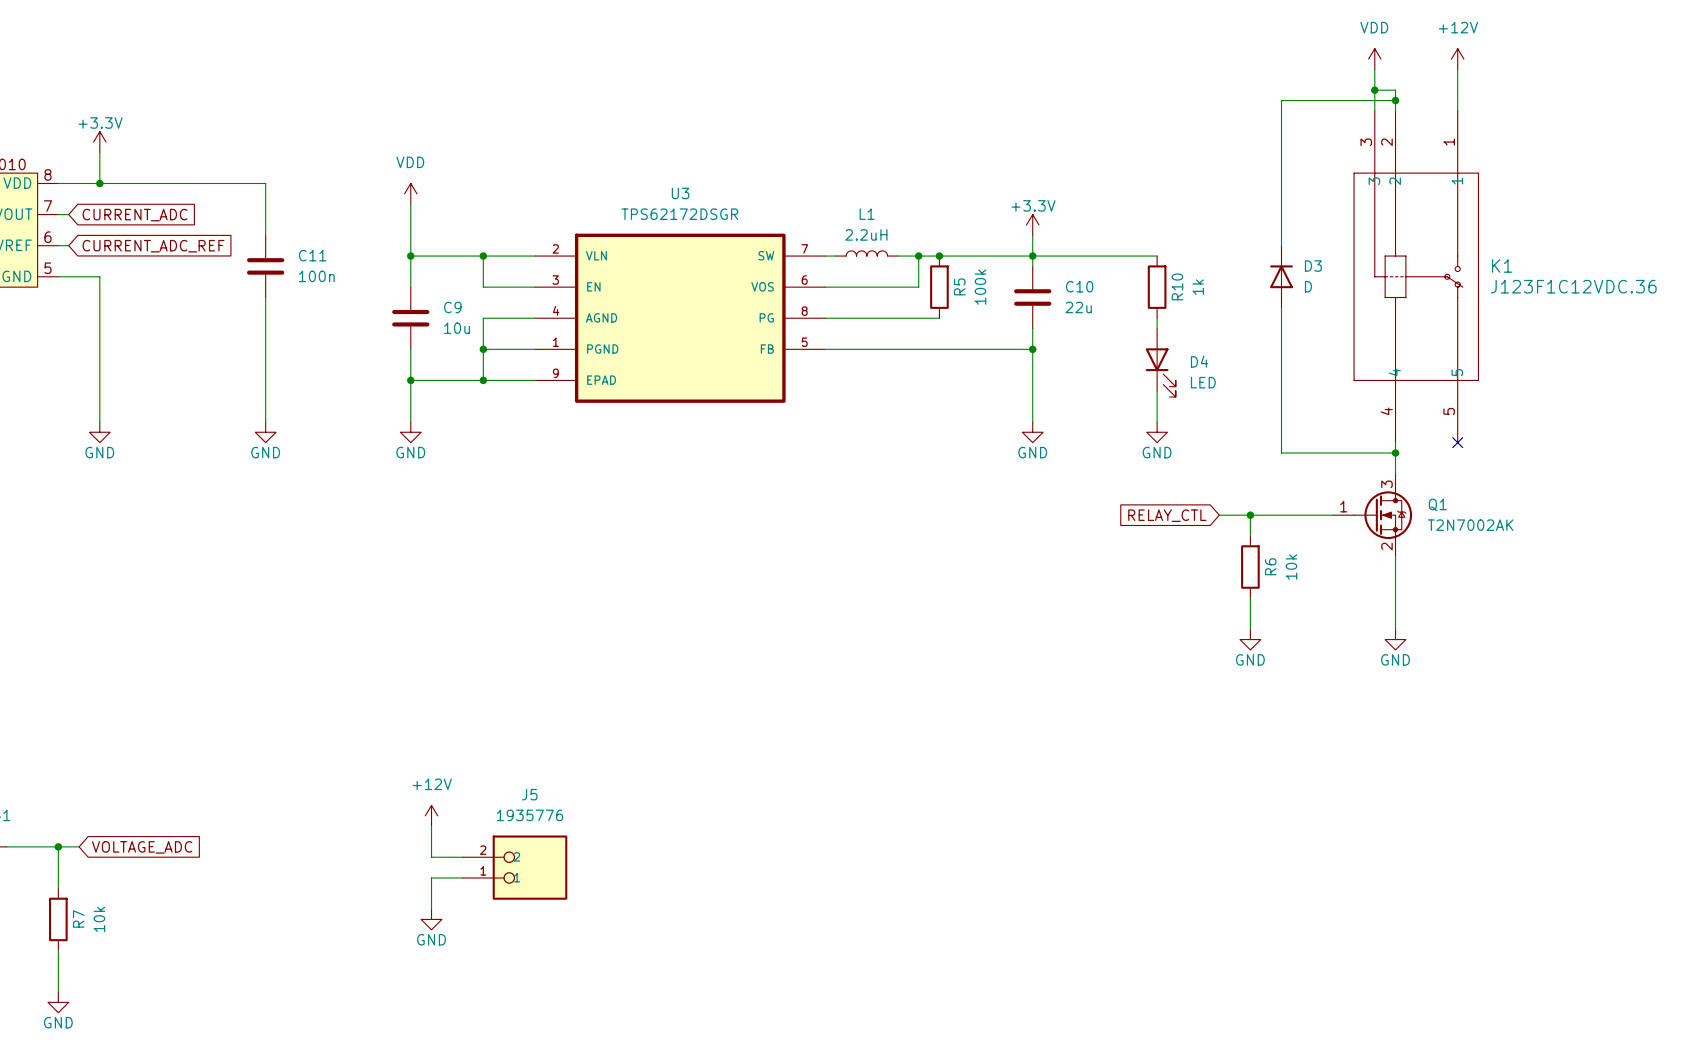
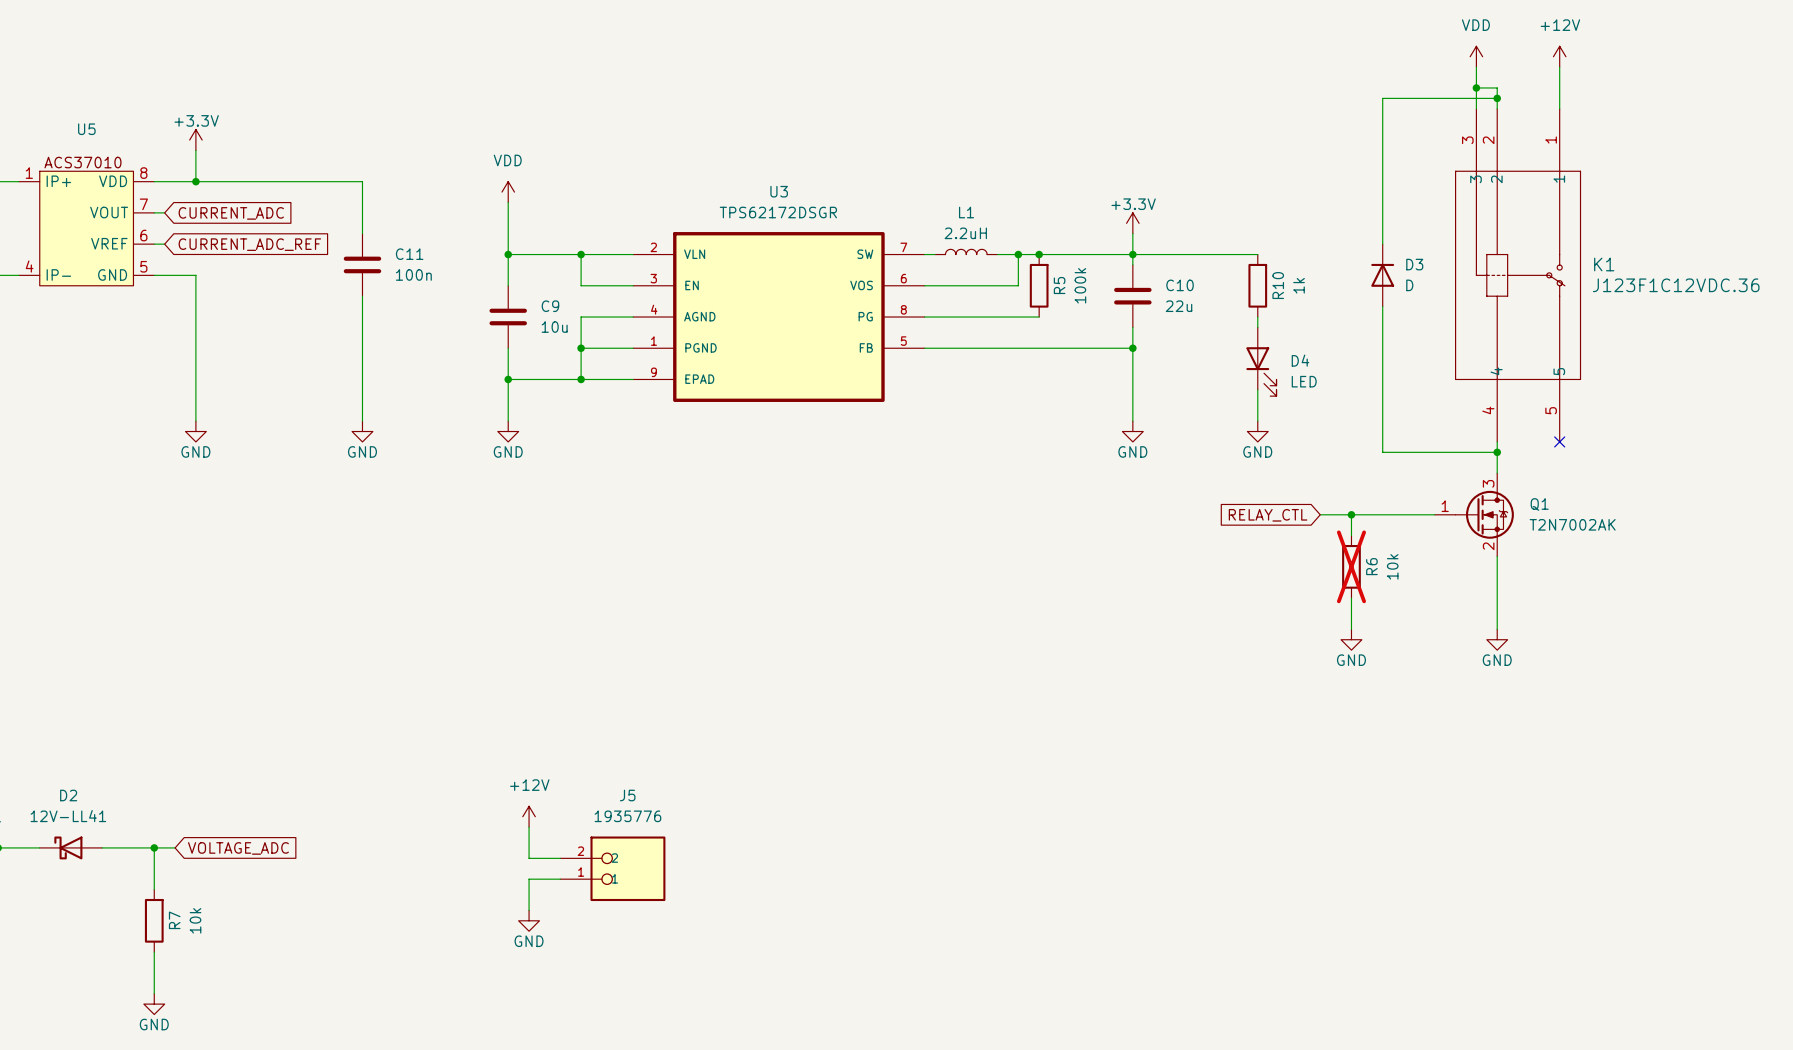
R6 do-not-place cross: none -> (1351, 566)

